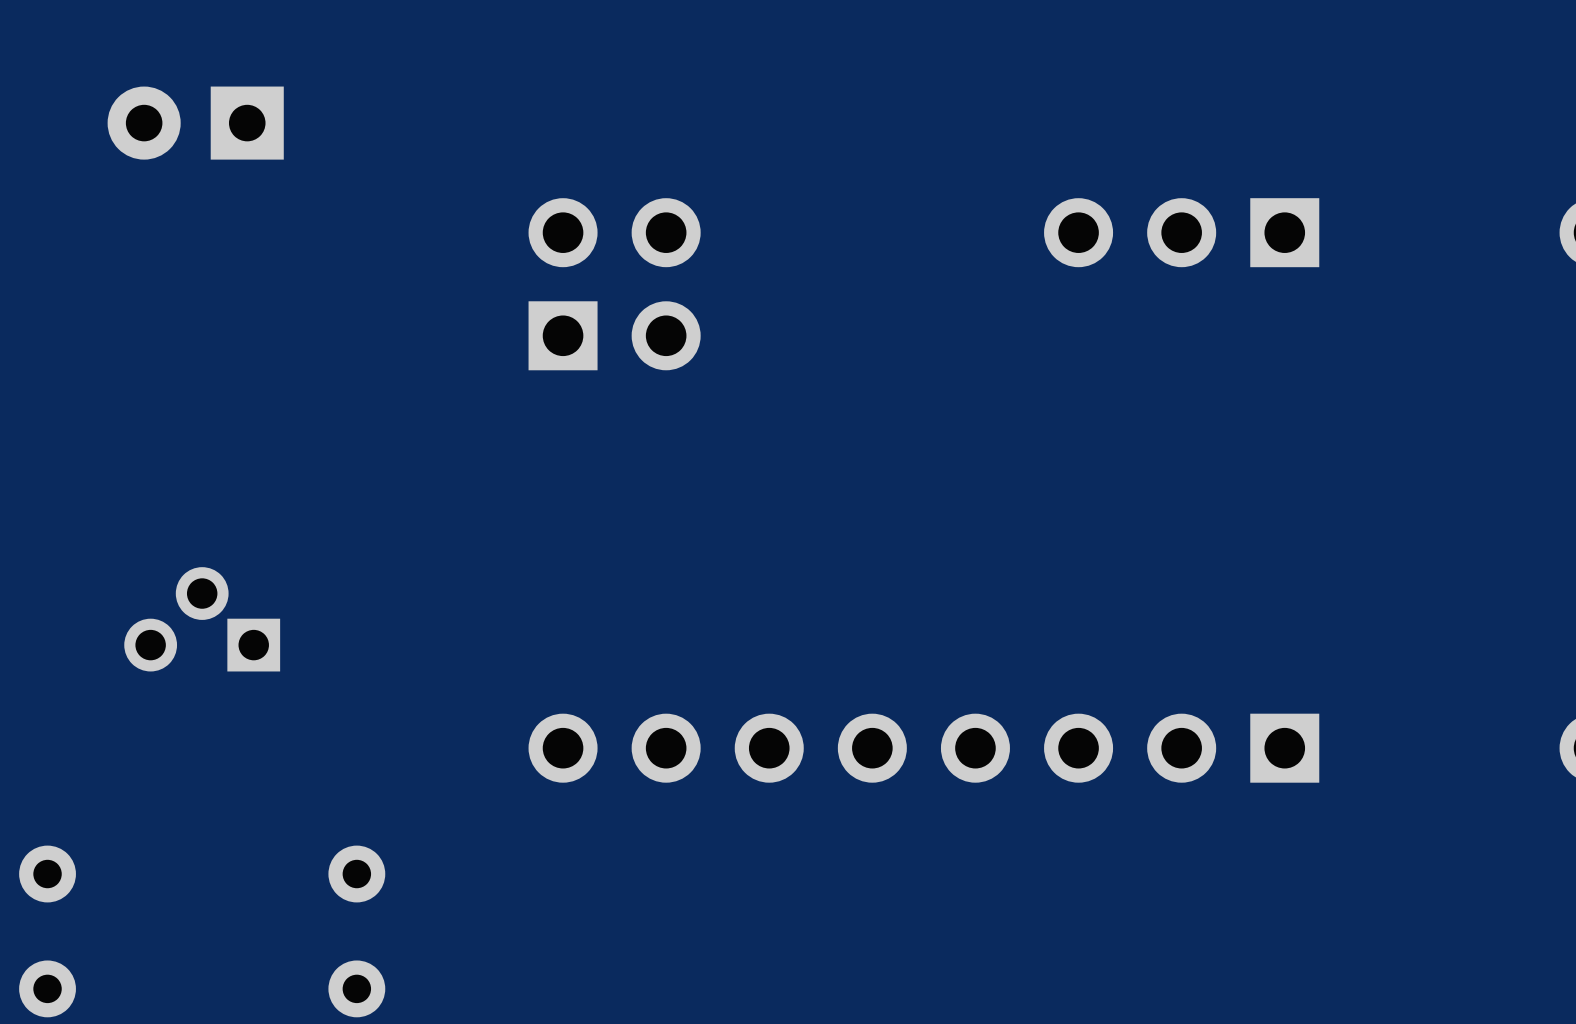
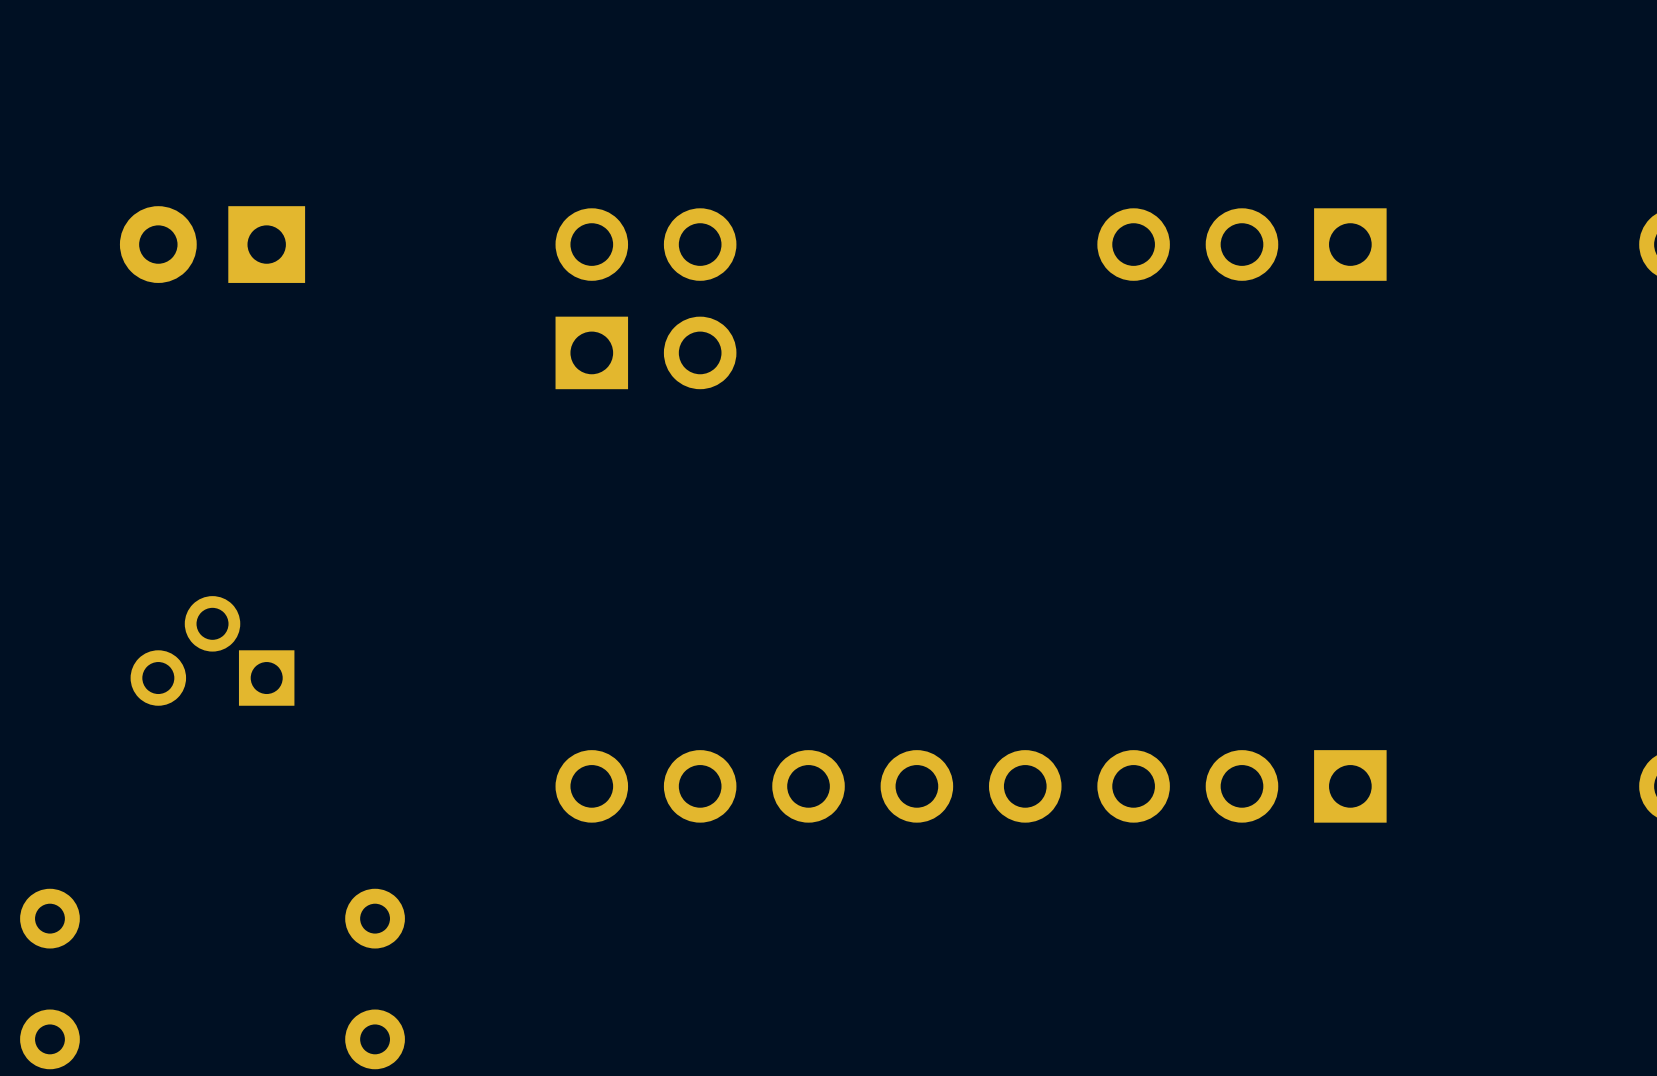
part position: (195, 123) -> (212, 244)

